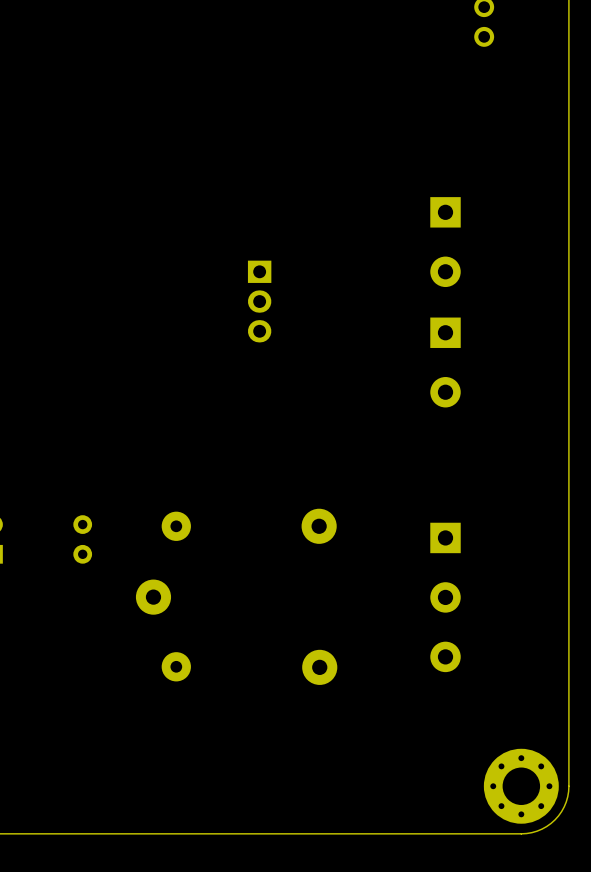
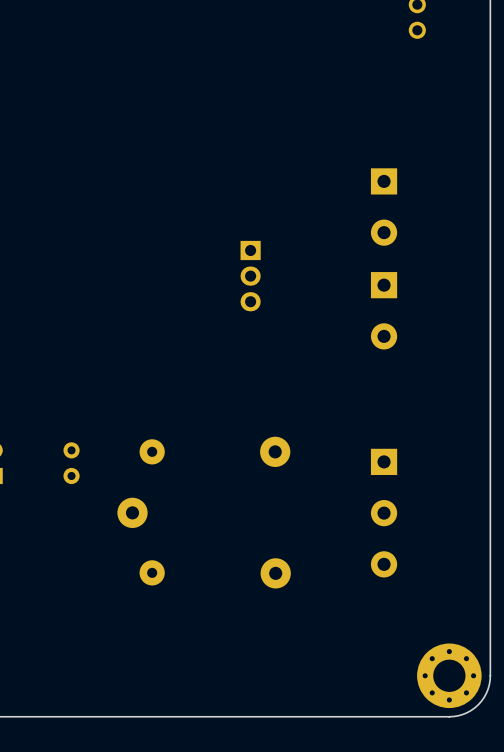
part position: (259, 301) -> (250, 276)

